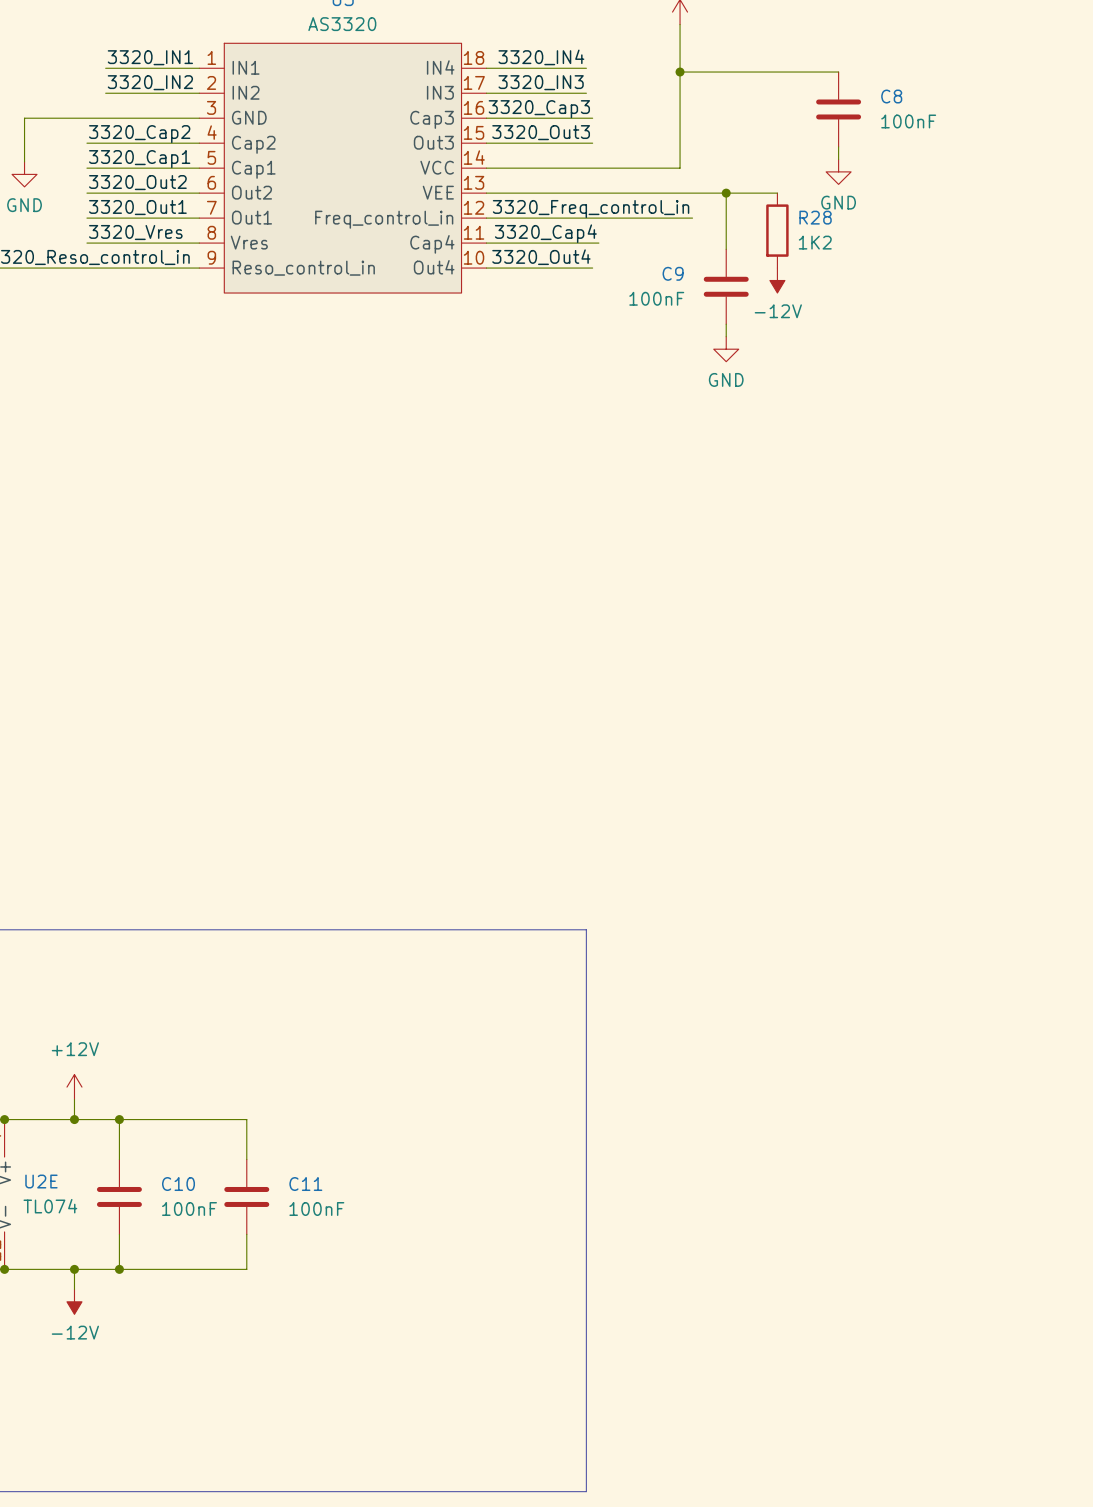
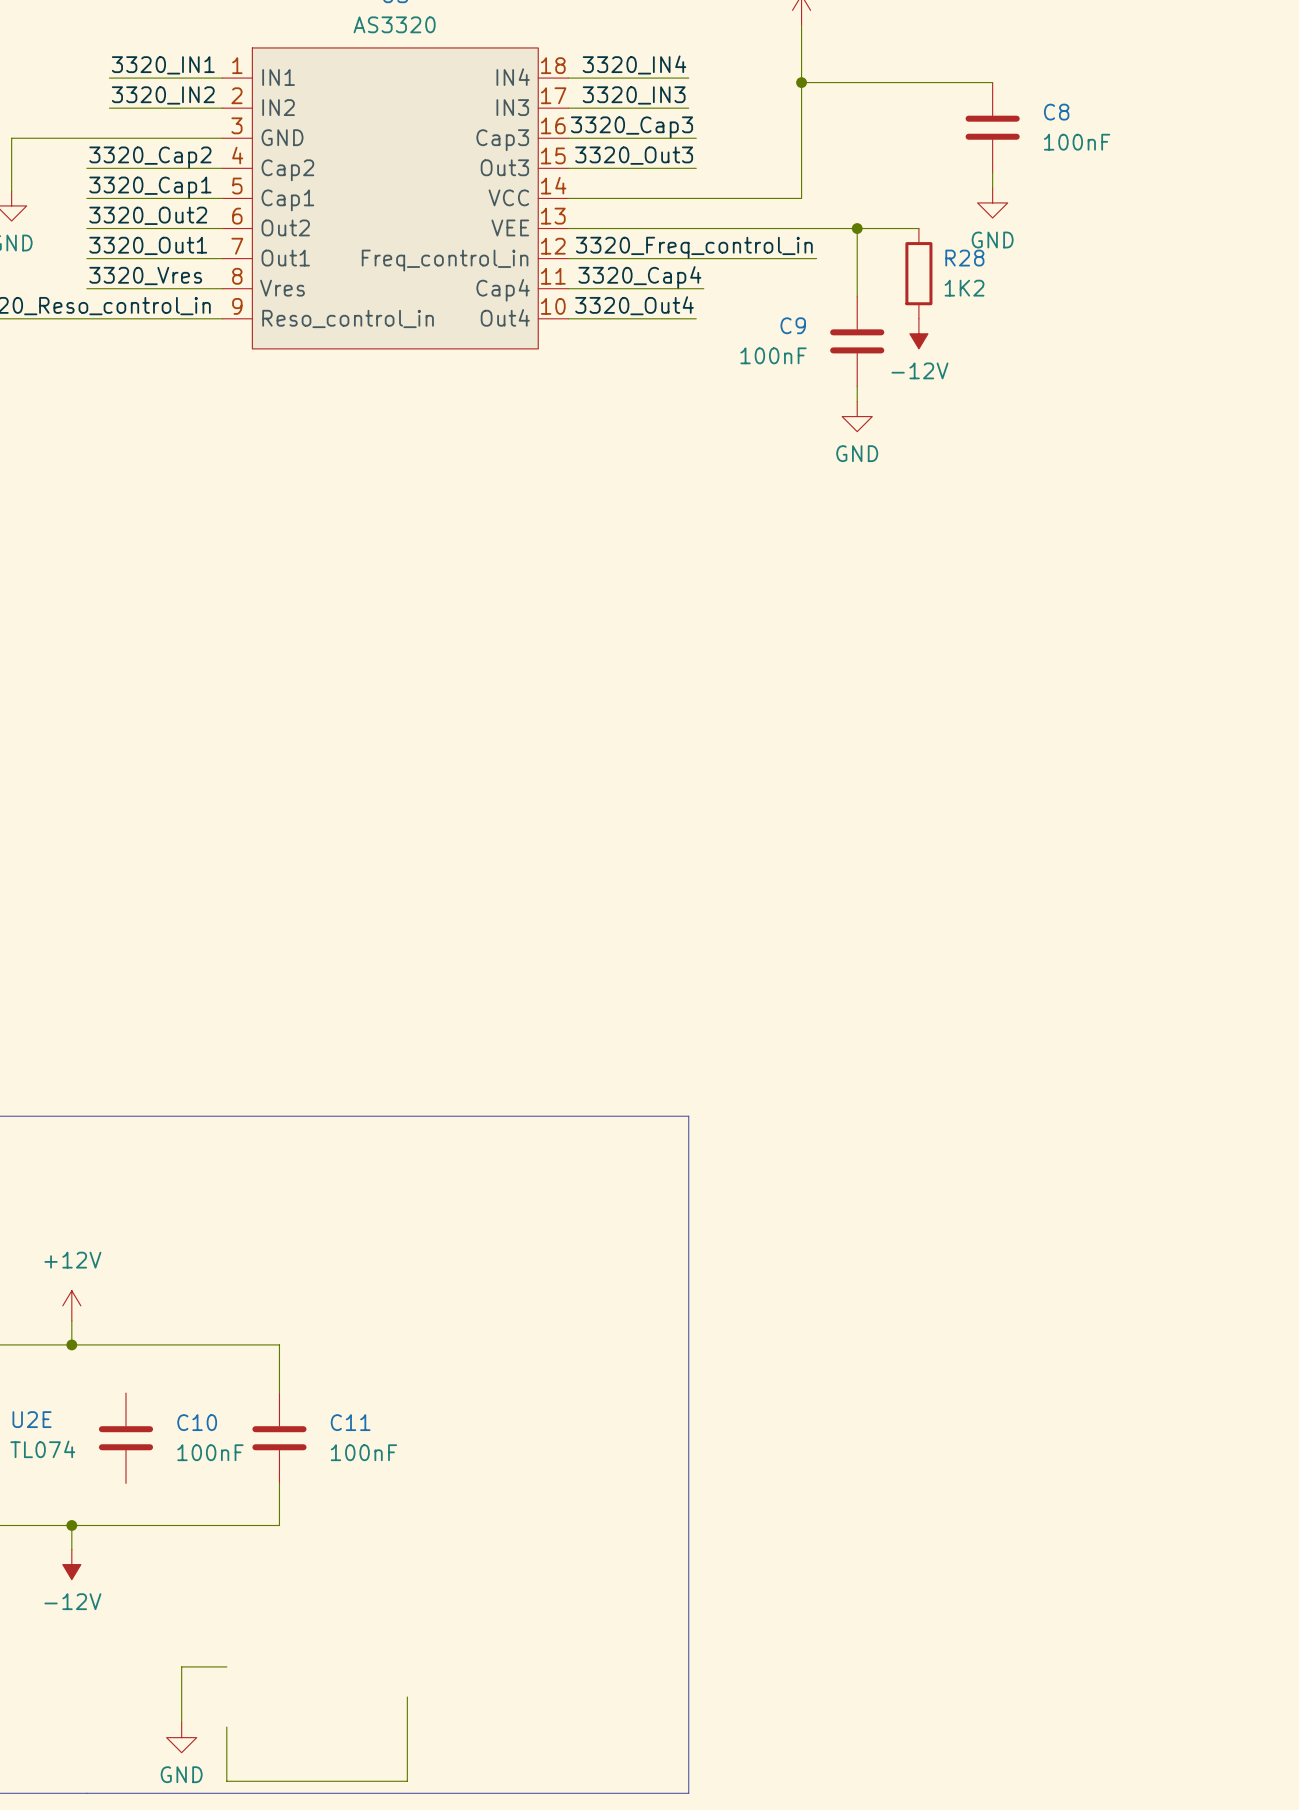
wire: (119, 1119) (119, 1159) -> none
junction: (119, 1119) -> none
wire: (119, 1234) (119, 1269) -> none
junction: (119, 1269) -> none
wire: none -> (226, 1666) (181, 1666) (181, 1722)
wire: none -> (407, 1697) (407, 1781) (226, 1781) (226, 1727)
power symbol: none -> GND (181, 1737)

